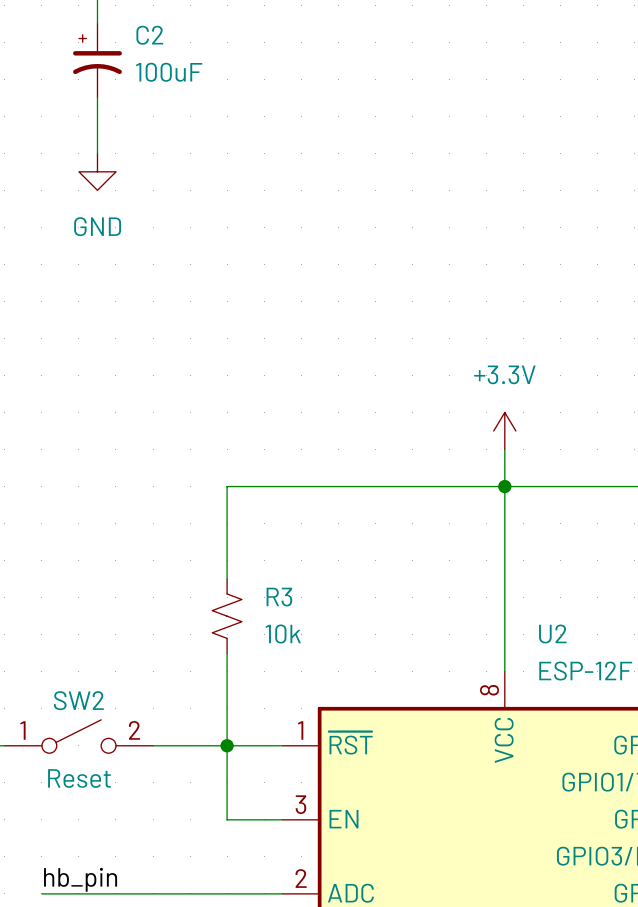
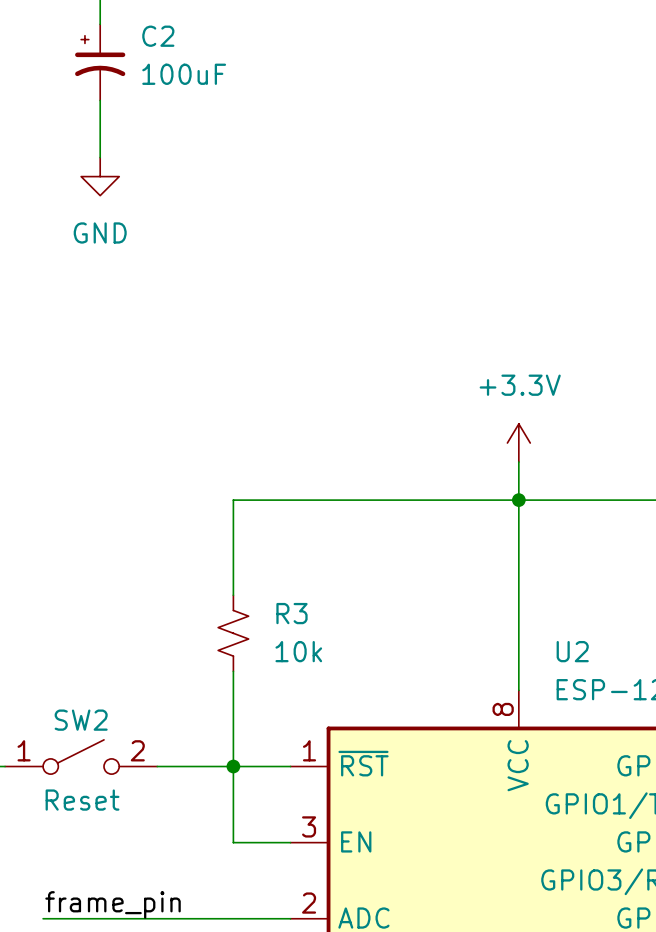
label: hb_pin (80, 879) -> frame_pin (113, 904)

